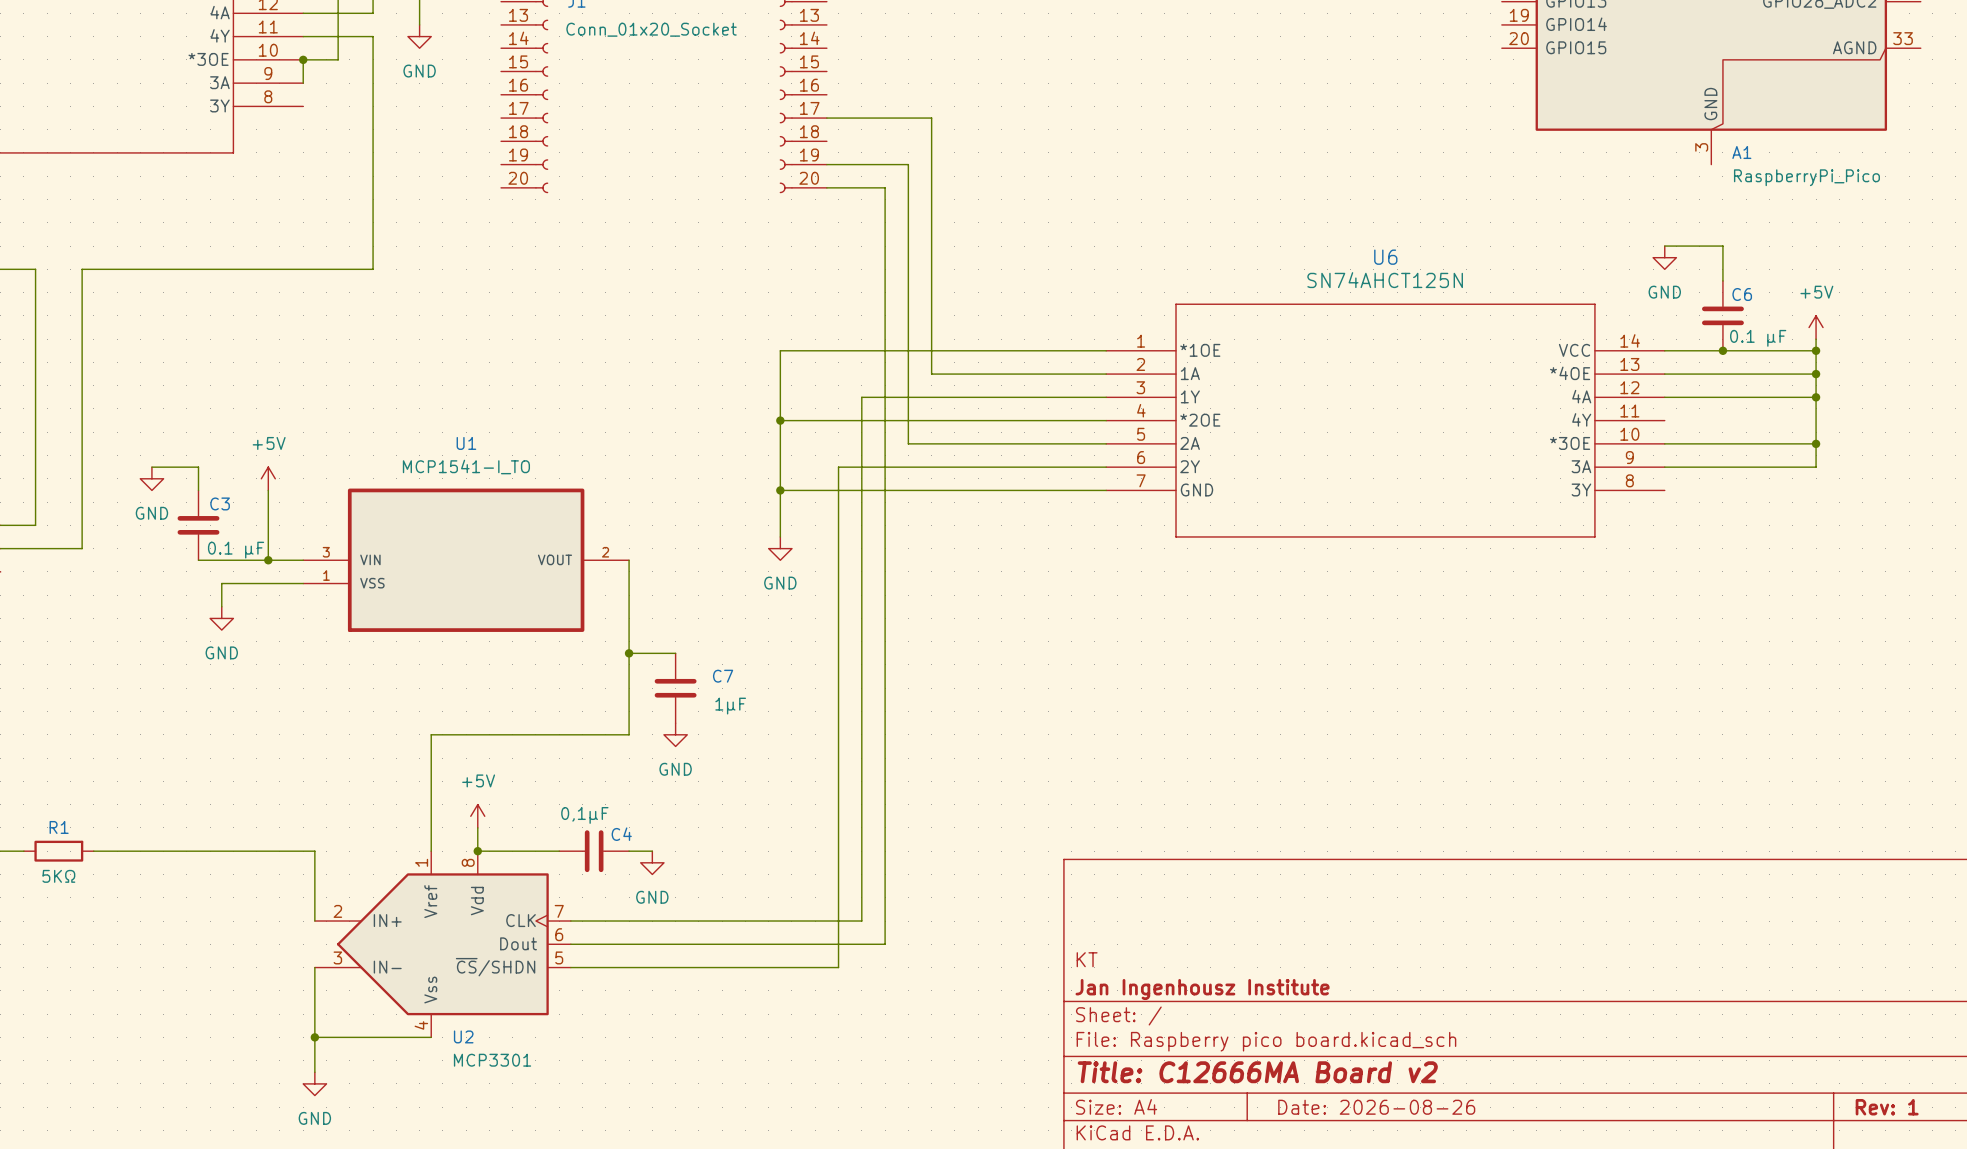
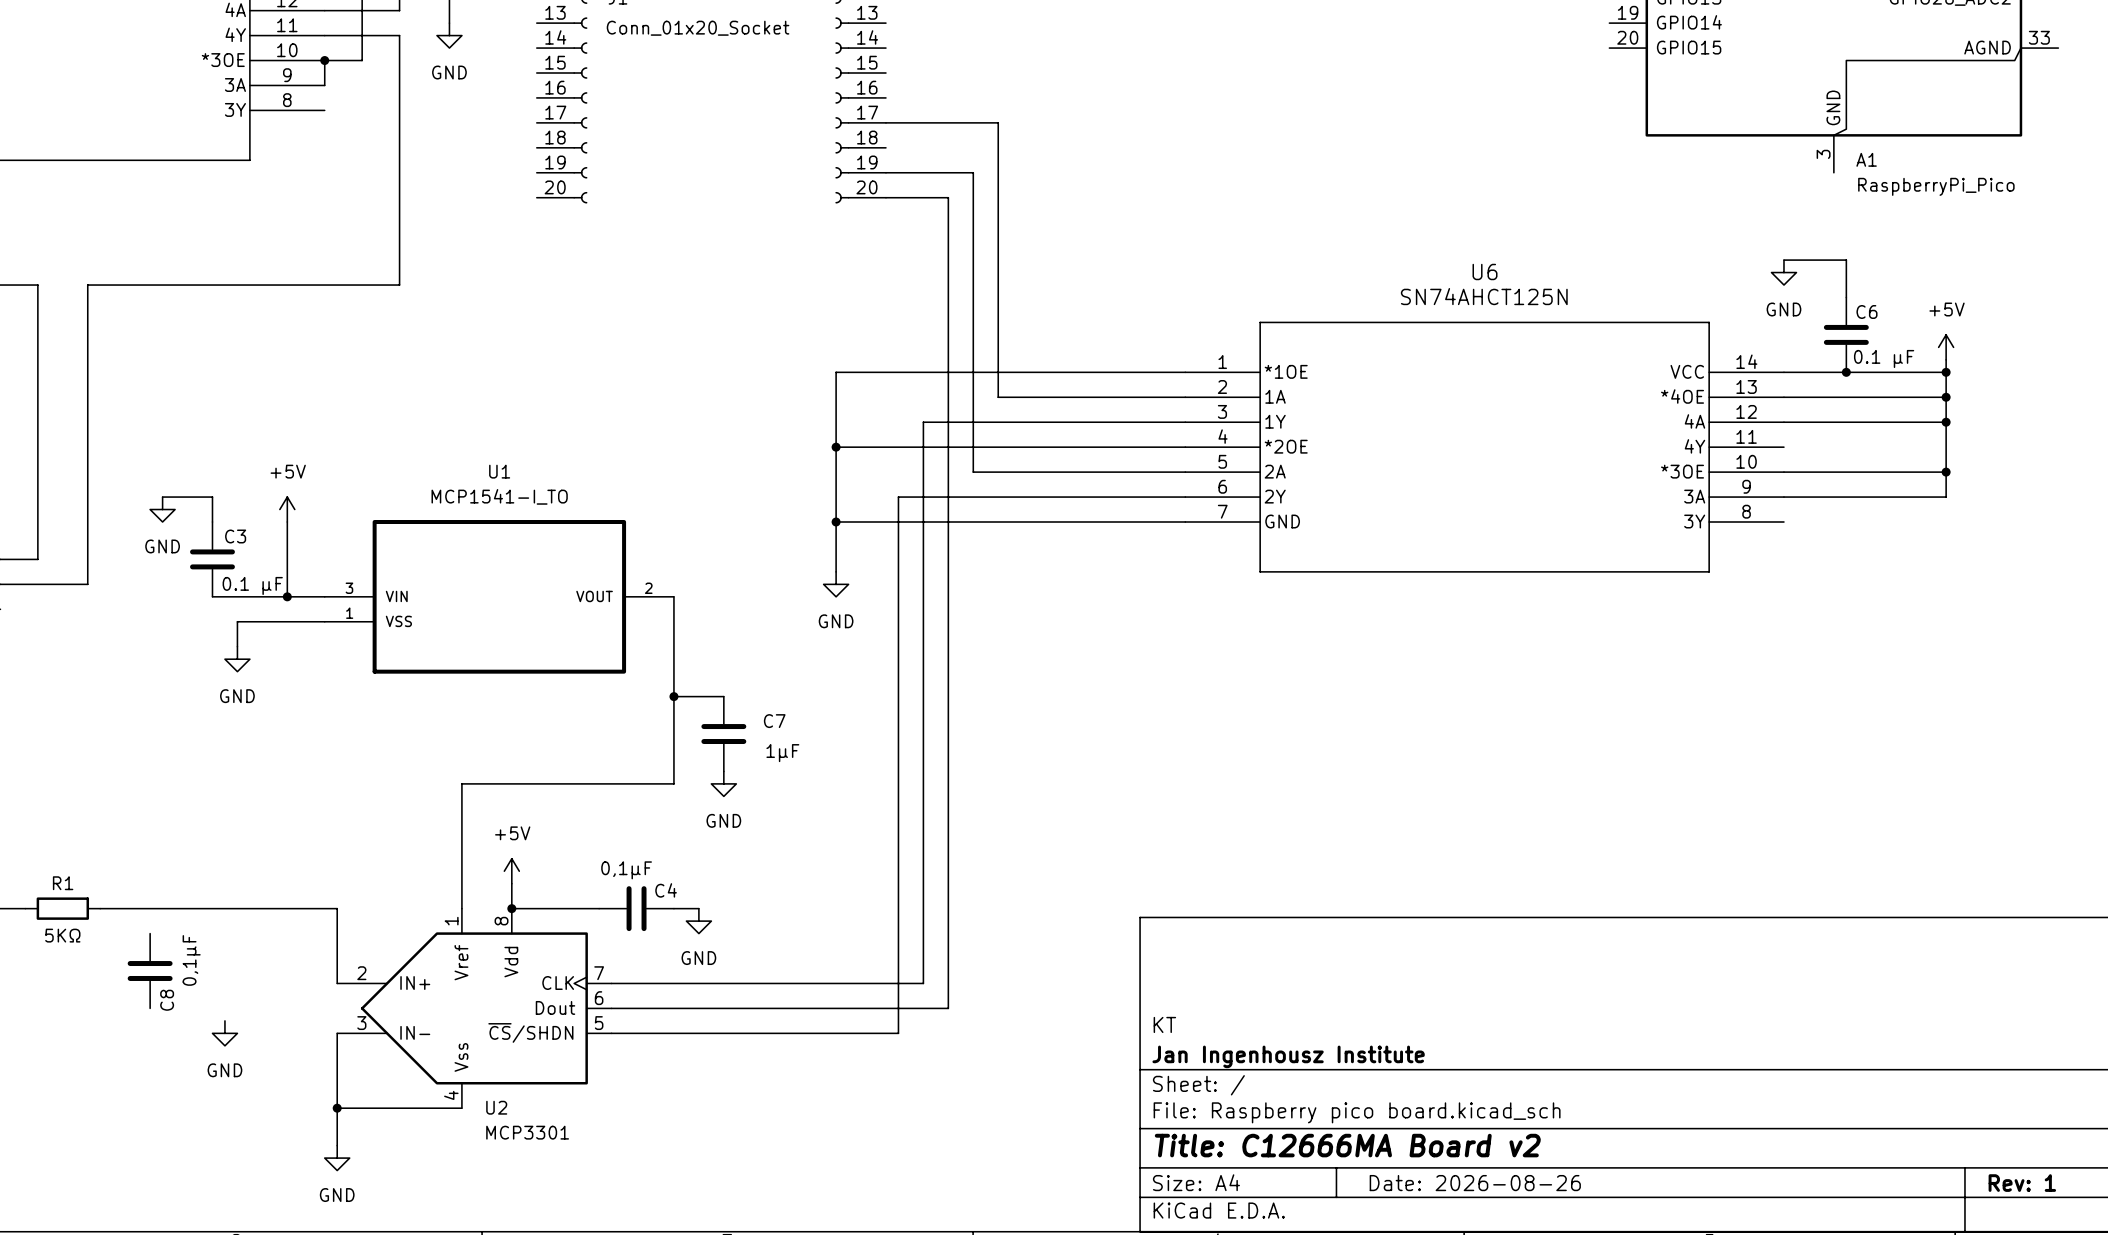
C8: none -> 0,1μF (150, 970)
power symbol: none -> GND (224, 1033)

